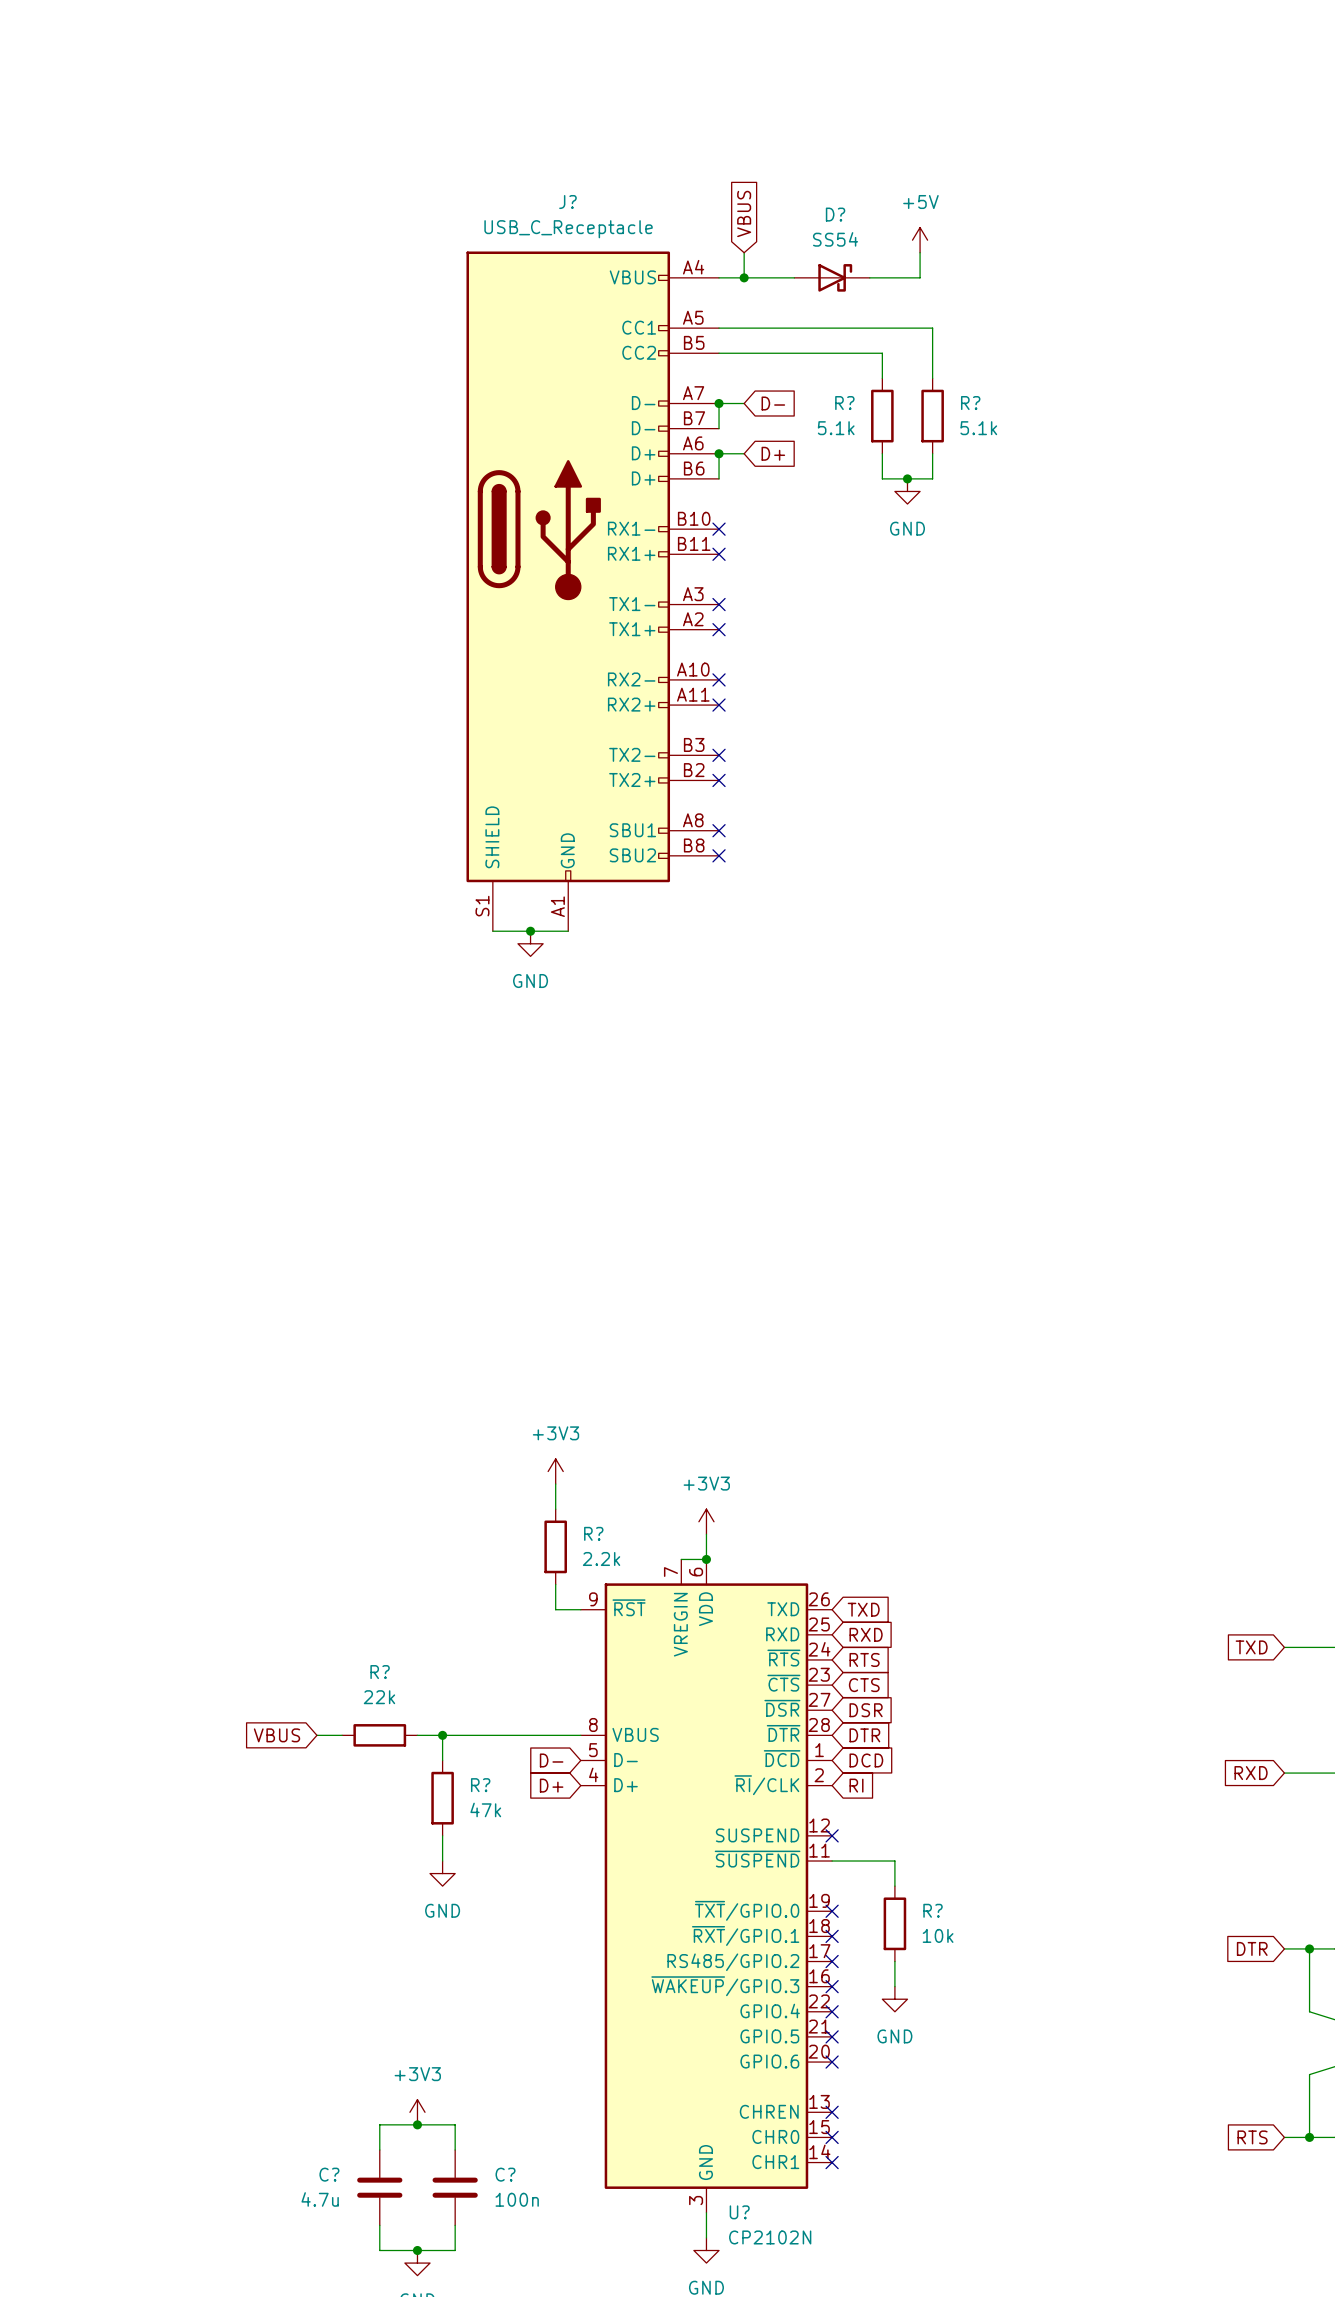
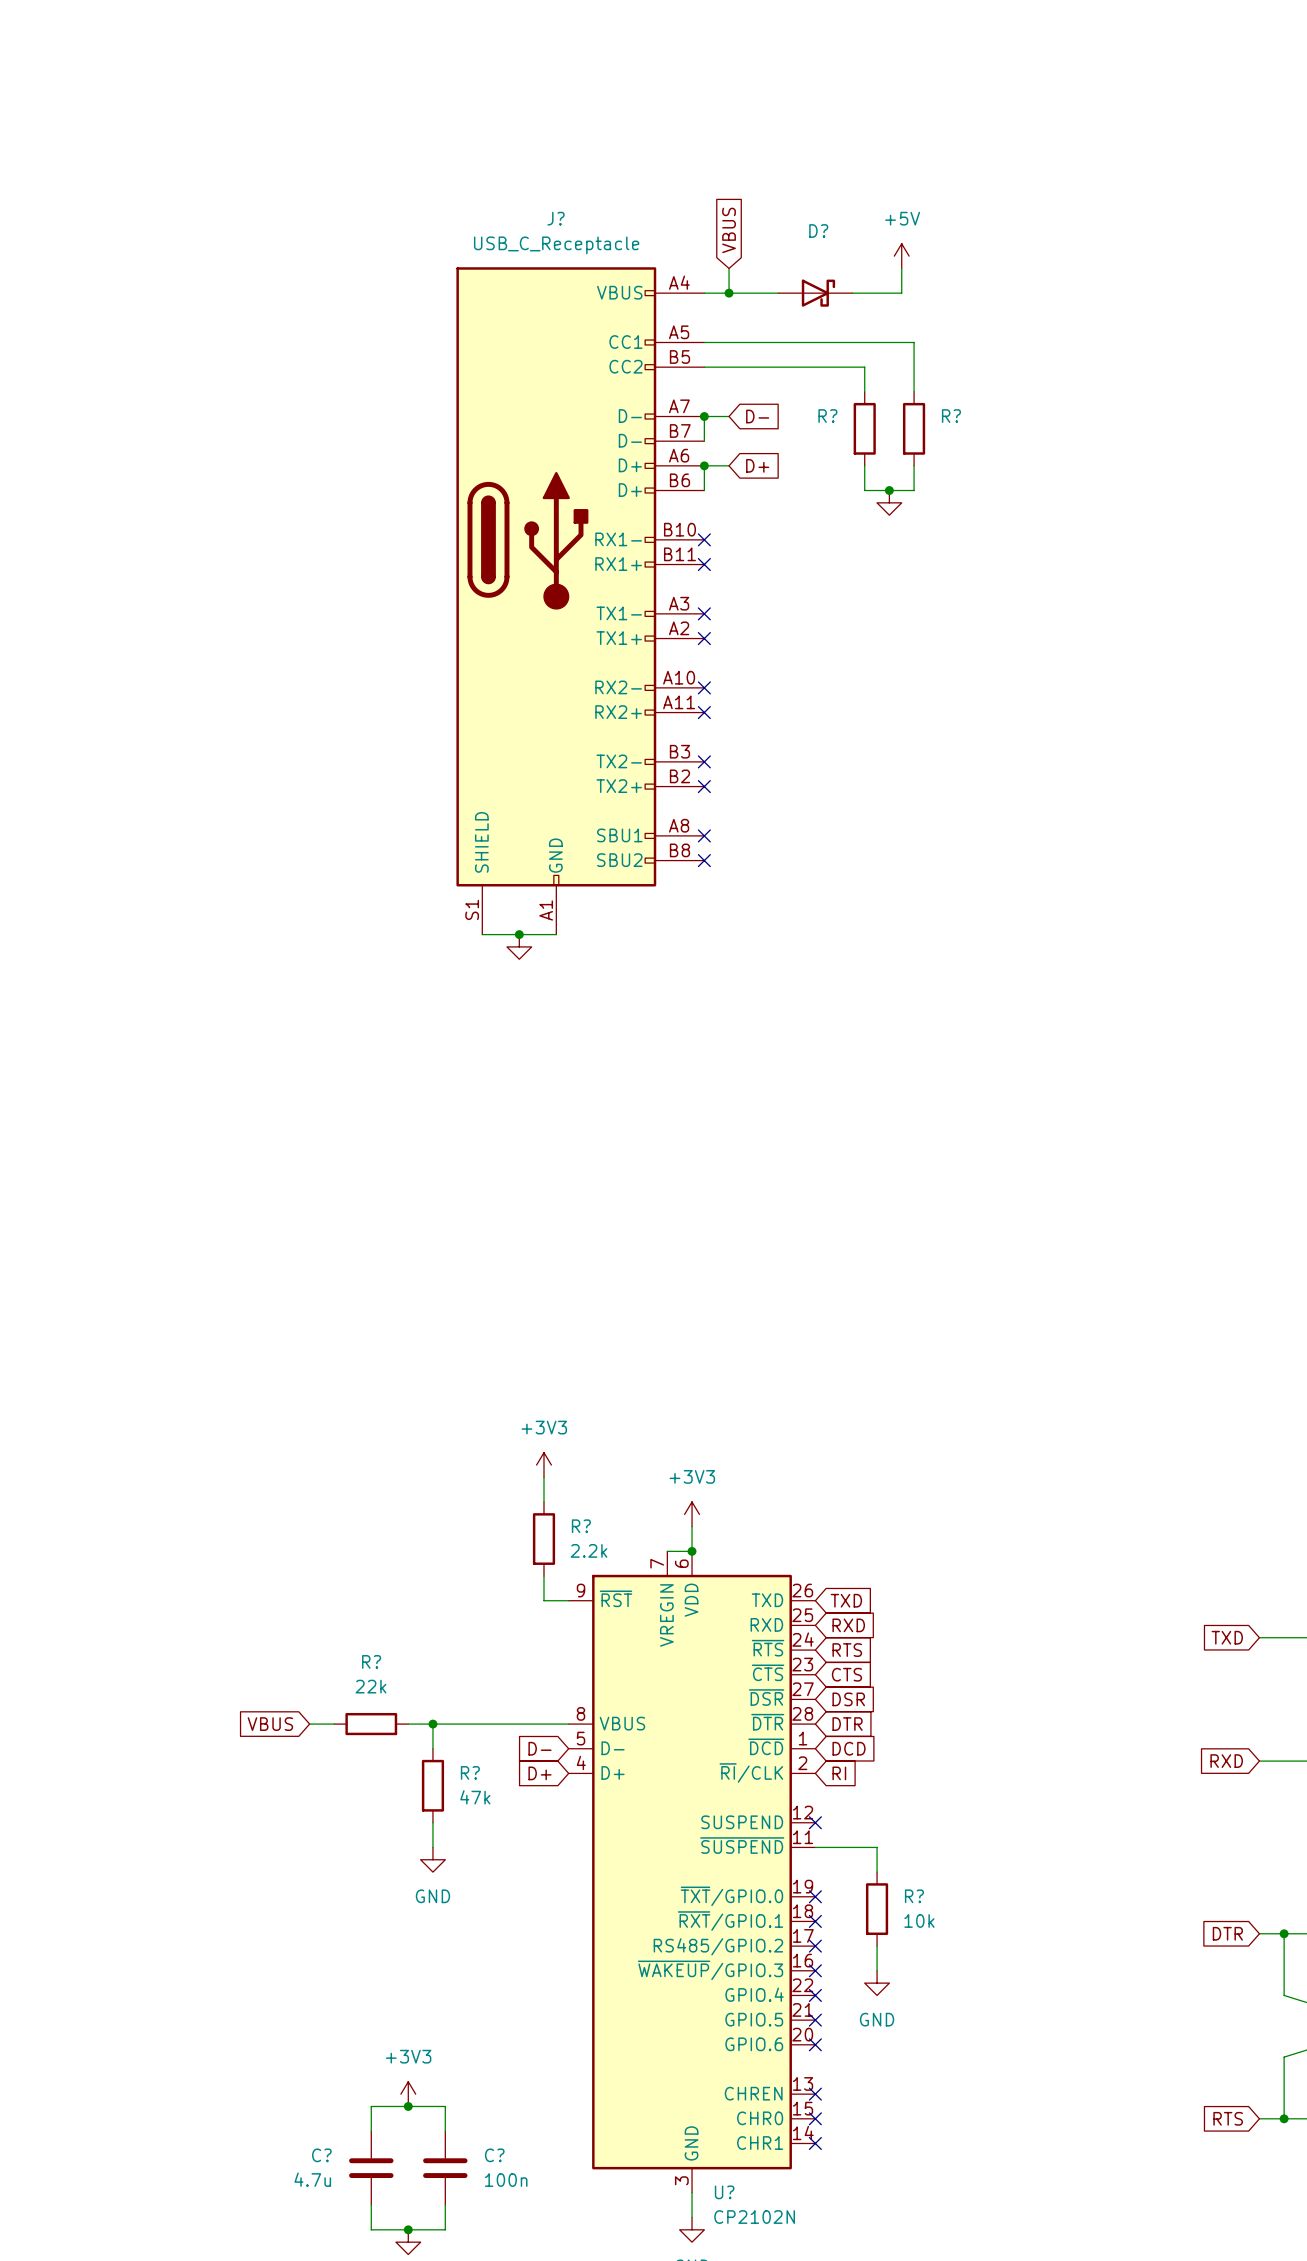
D? value: SS54 (835, 239) -> none
R? value: 5.1k (836, 428) -> none
R? value: 5.1k (978, 428) -> none
power symbol text: GND (907, 528) -> none
power symbol text: GND (530, 981) -> none

